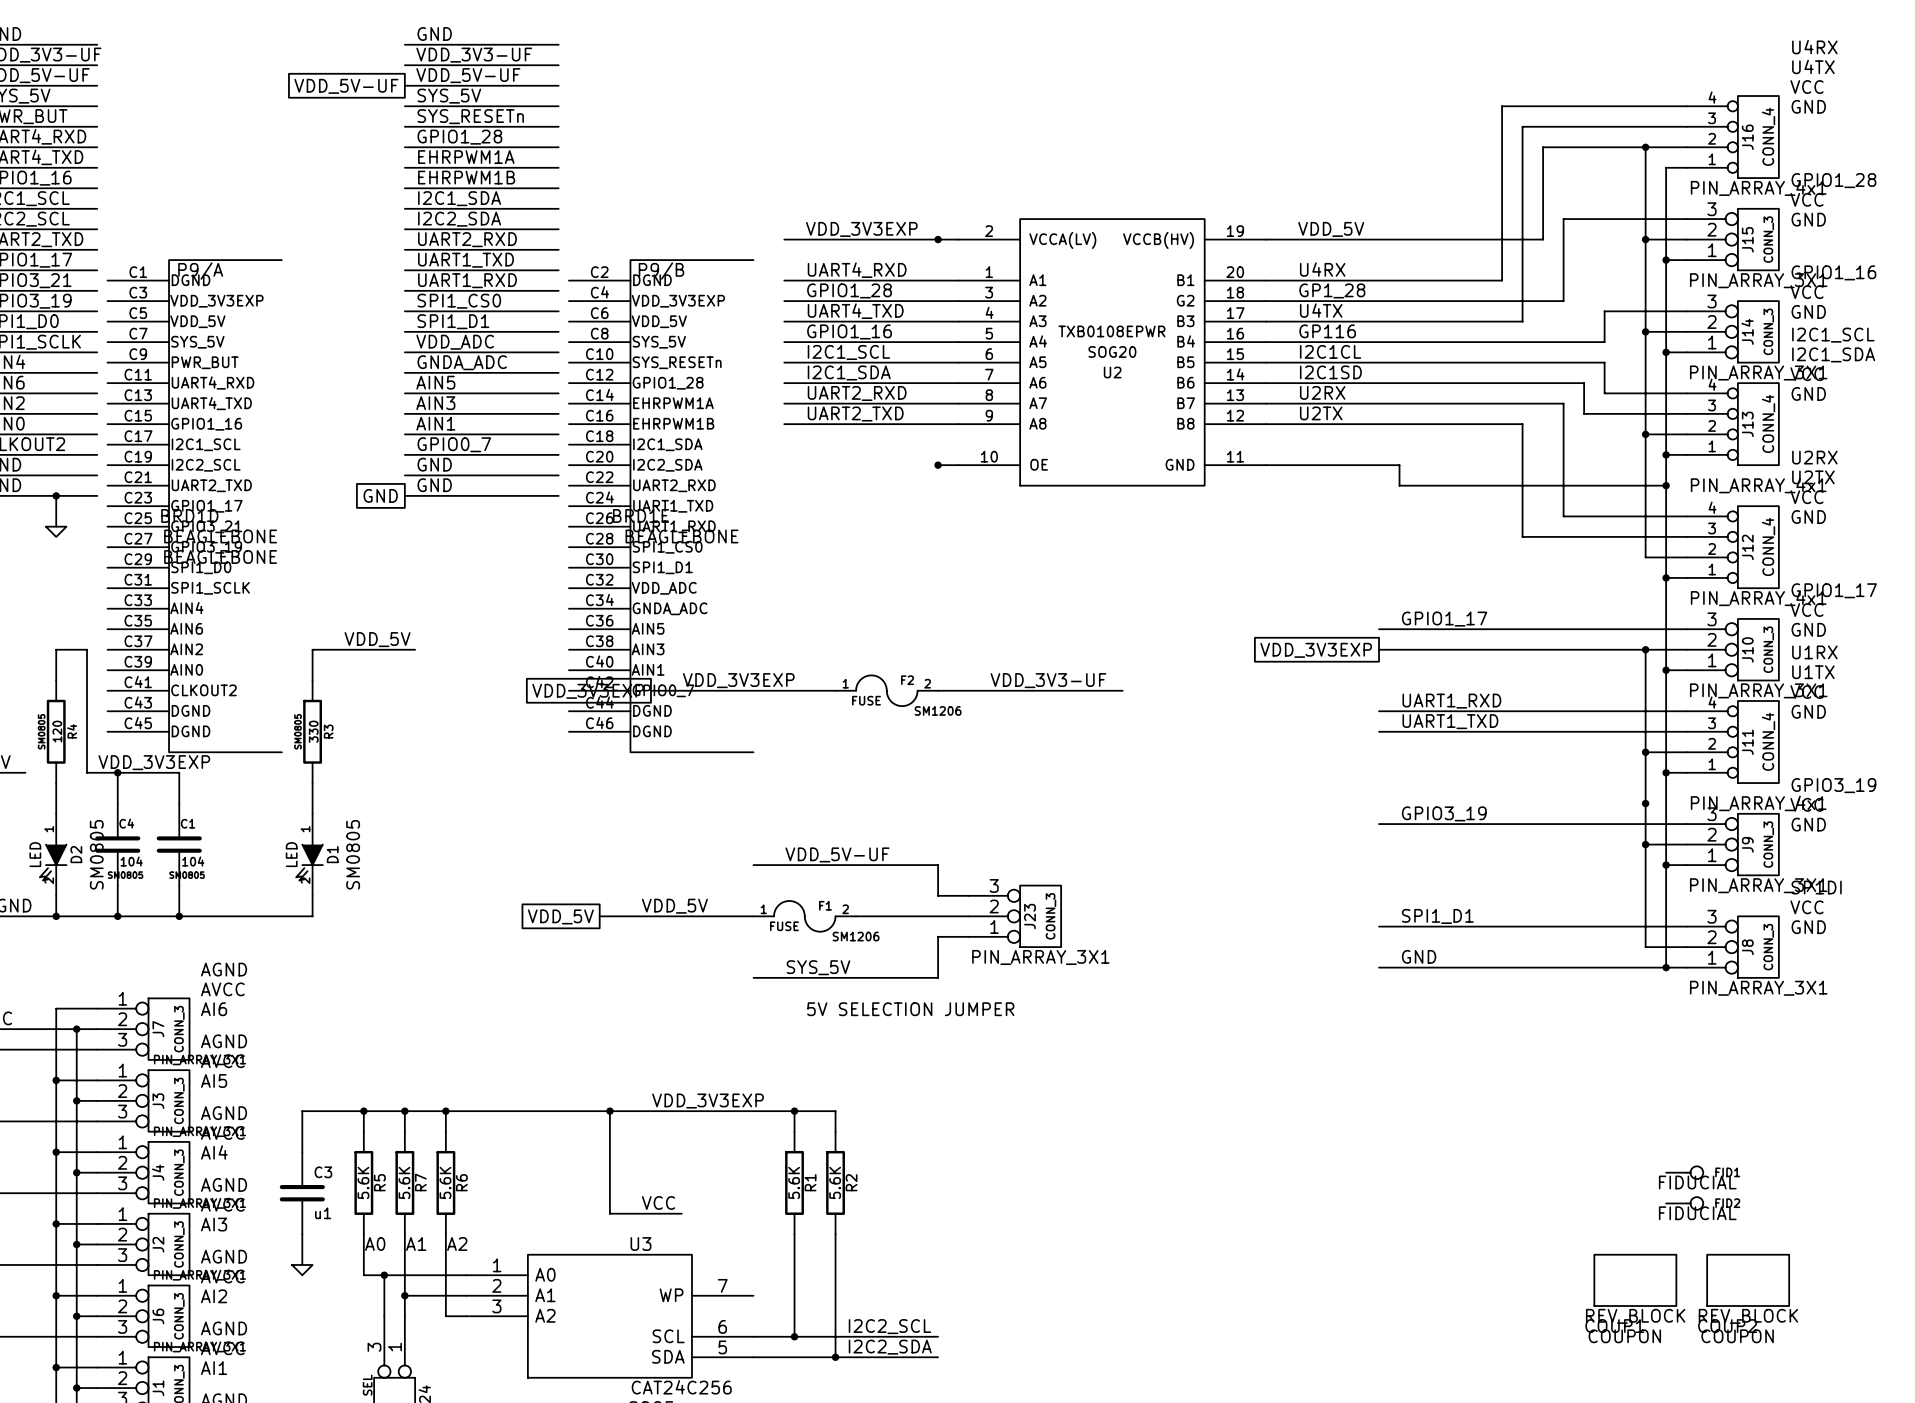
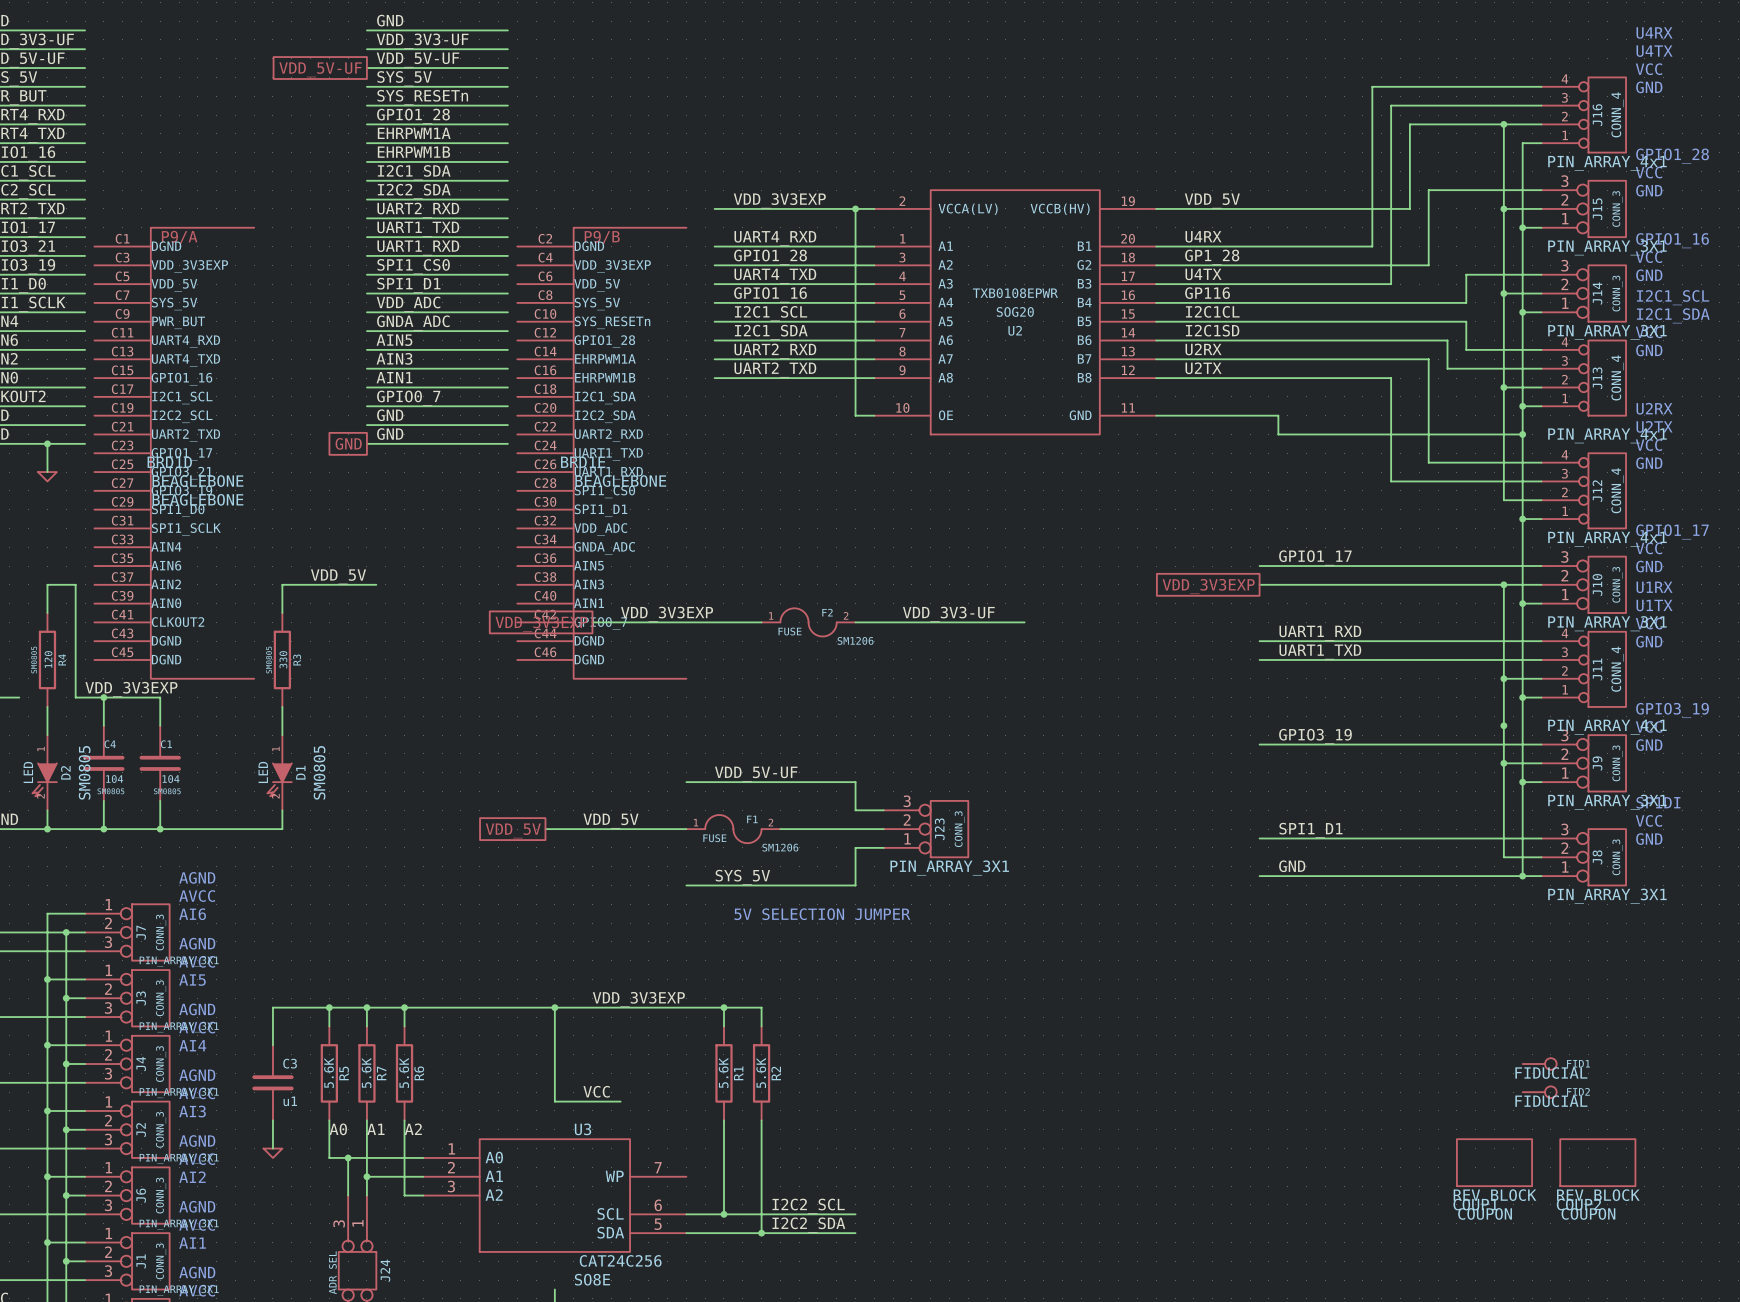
wire: none -> (855, 208) (855, 415)
junction: (938, 465) -> none

